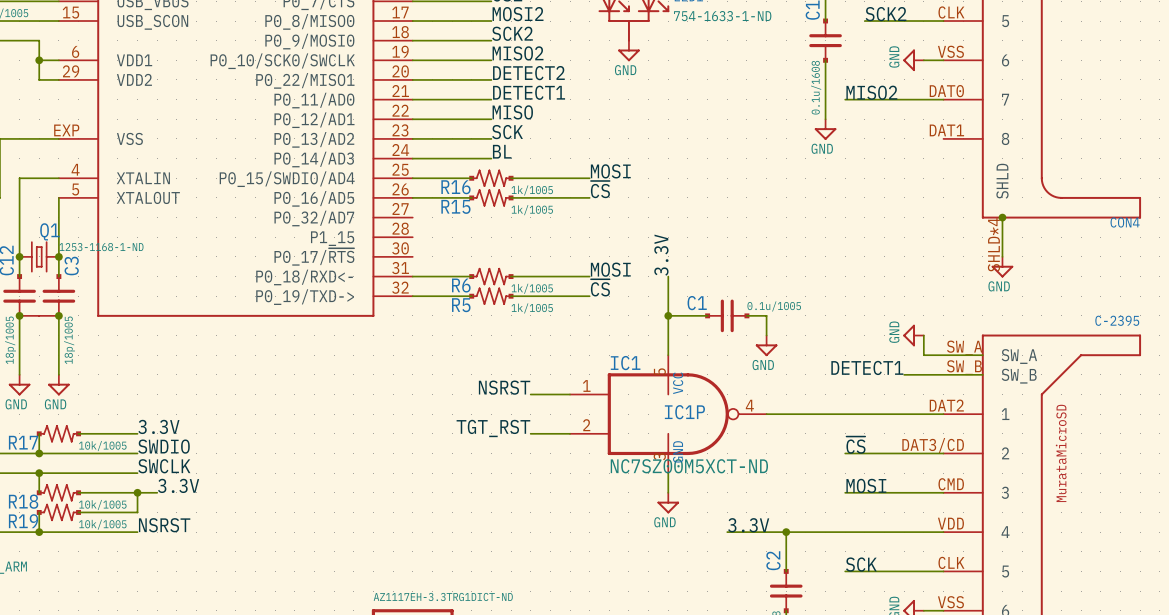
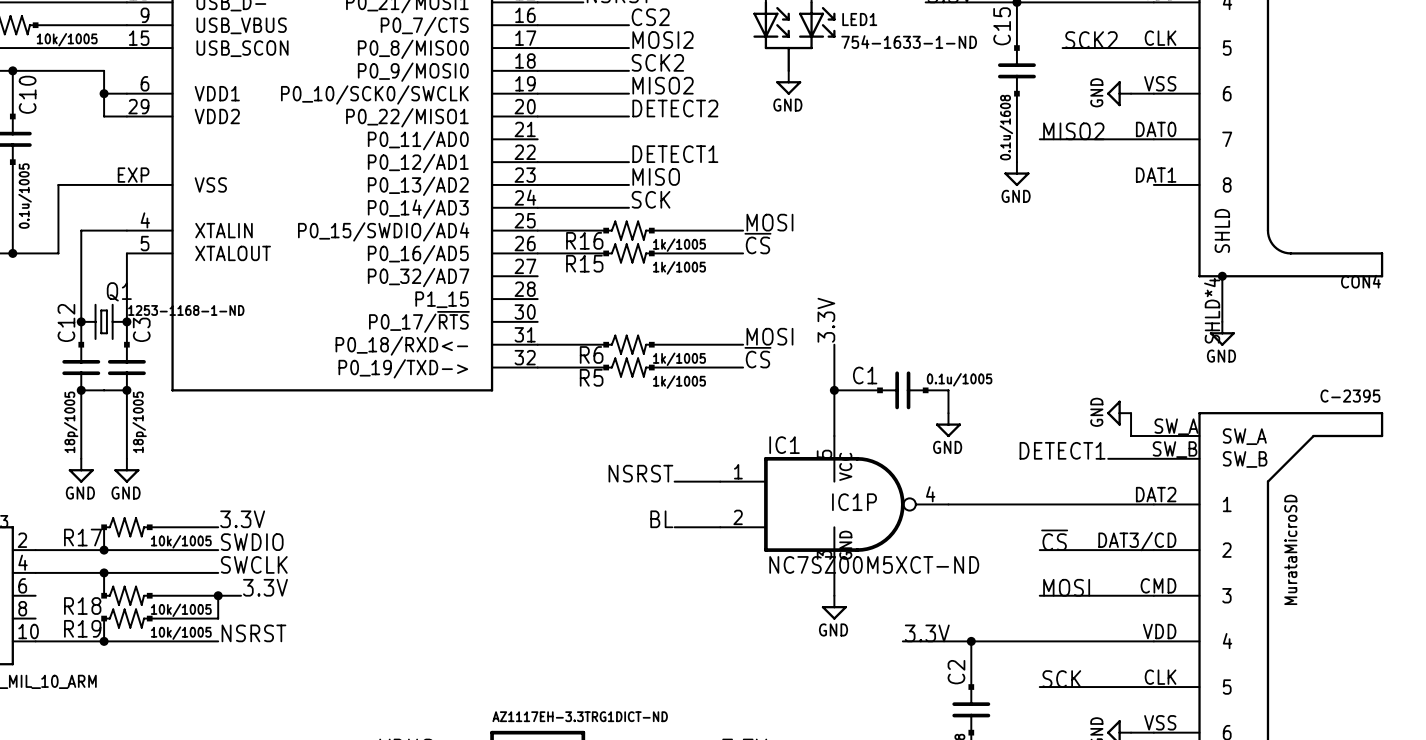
label: DETECT1 (529, 92) -> none
wire: (412, 99) (491, 99) -> none
label: MISO (512, 112) -> DETECT1 (675, 154)
label: SCK (507, 132) -> MISO (656, 176)
label: BL (502, 151) -> SCK (651, 199)
label: TGT_RST (493, 428) -> BL (661, 519)

